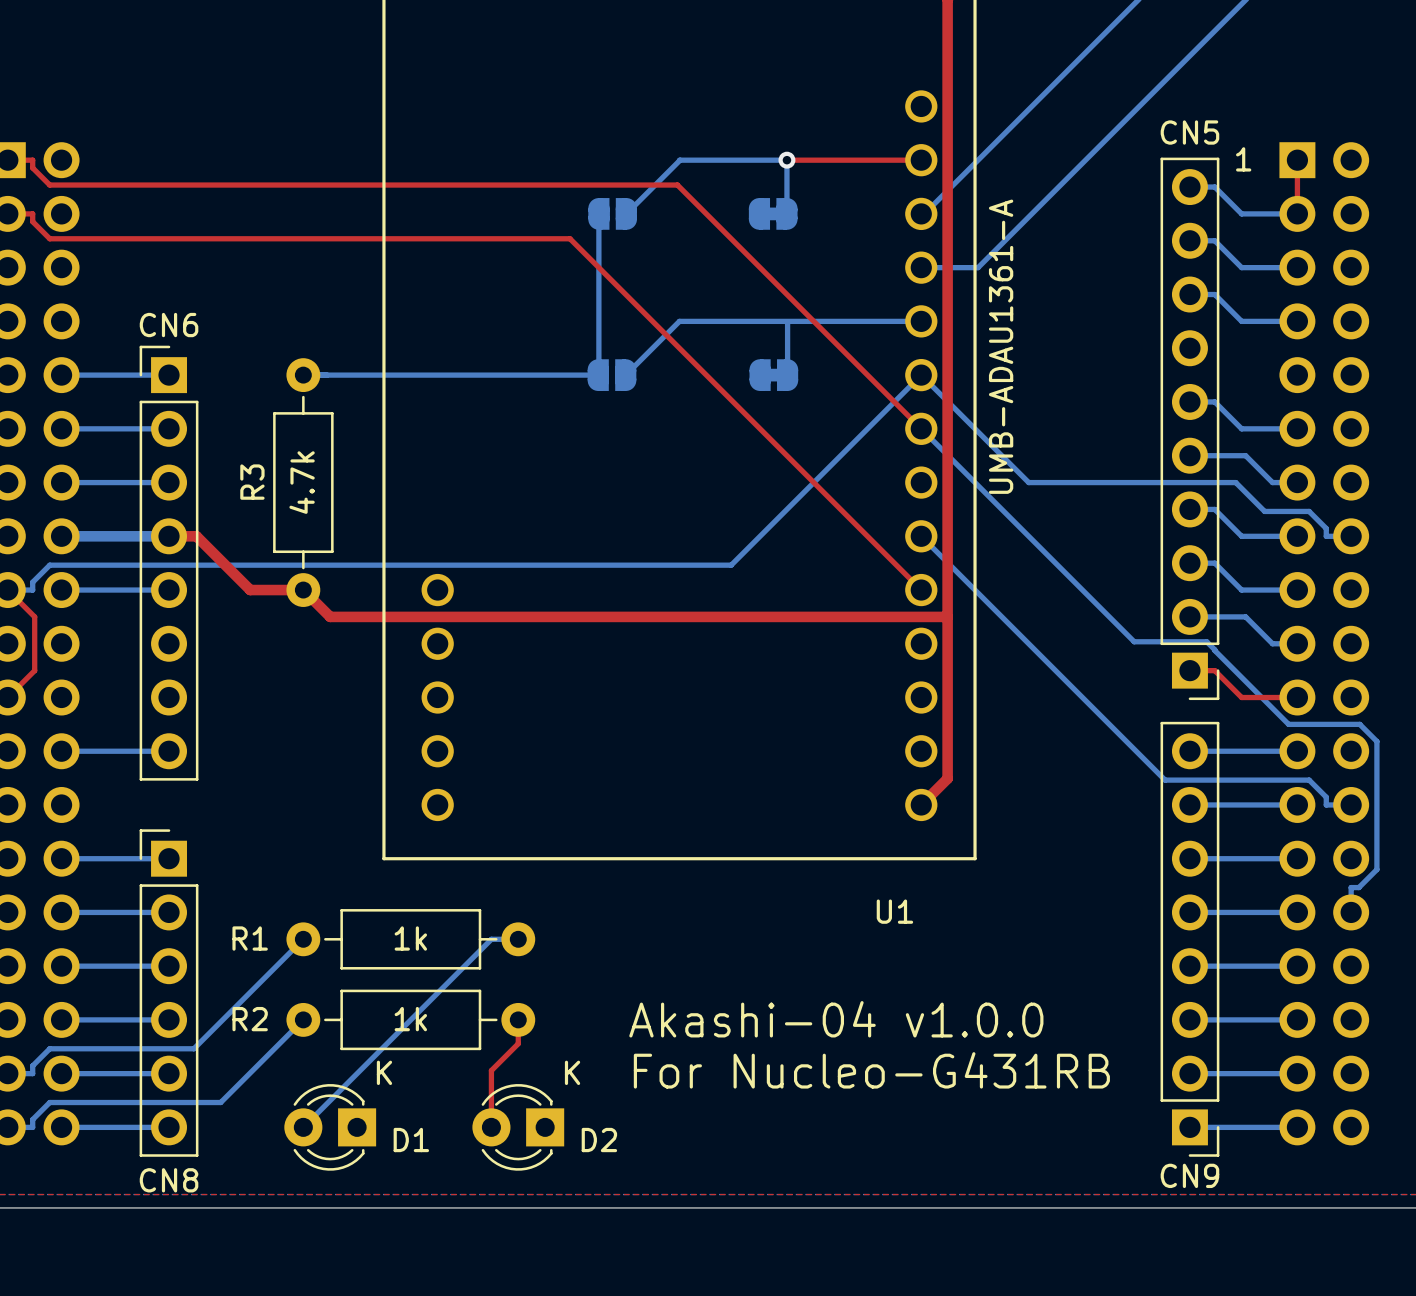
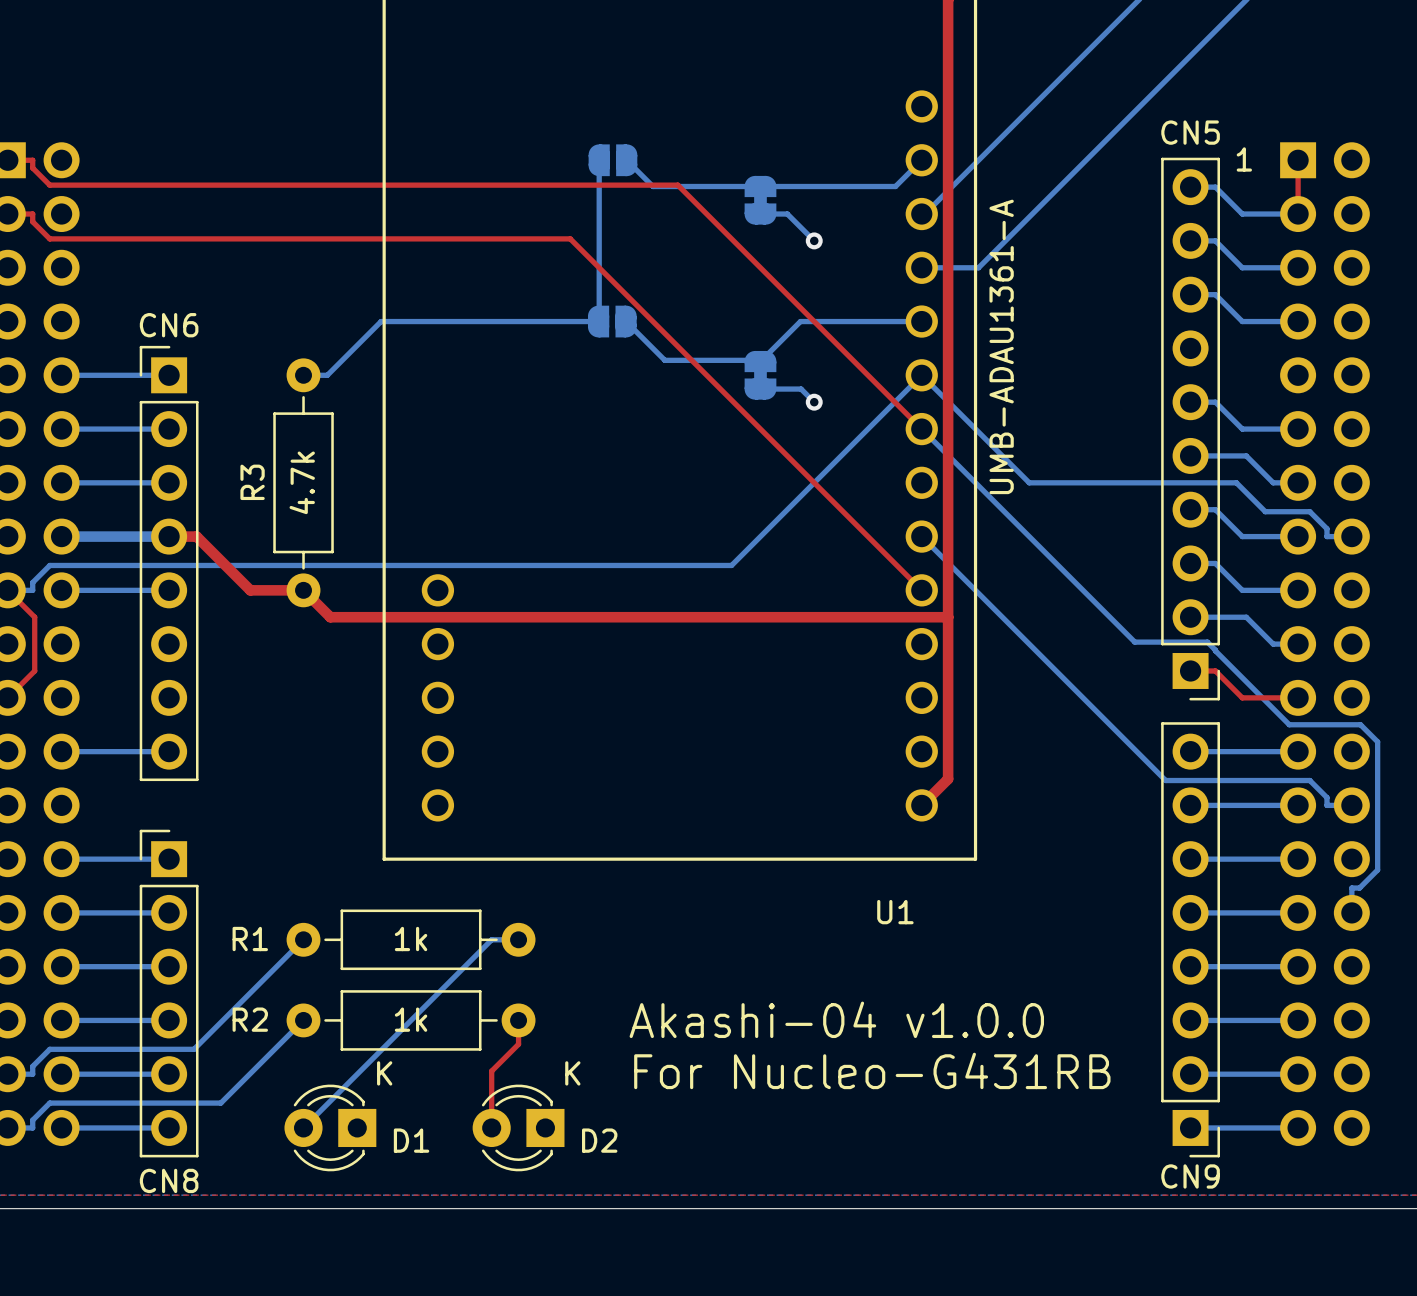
bottom track: none -> (599, 160) (599, 214)
part: none -> (612, 160)
bottom track: none -> (626, 160) (652, 186) (895, 186) (921, 160)
bottom track: (679, 160) (786, 160) (786, 213) -> none
bottom track: (680, 160) (626, 213) -> none
top track: (786, 160) (921, 160) -> none
via position: (786, 160) -> (814, 240)
part: (612, 213) -> none
bottom track: none -> (760, 214) (787, 214) (814, 240)
part rotation: 0° (773, 213) -> 90° clockwise (760, 200)
bottom track: (598, 320) (598, 375) (327, 375) -> (599, 320) (381, 321) (327, 375)
part: none -> (612, 321)
bottom track: (800, 321) (679, 321) (625, 375) -> (800, 321) (760, 361) (664, 360) (626, 321)
bottom track: (787, 322) (787, 375) -> none
part: (612, 375) -> none
part rotation: 0° (773, 375) -> 90° clockwise (760, 375)
bottom track: none -> (760, 389) (801, 389) (814, 402)
via: none -> (814, 402)

